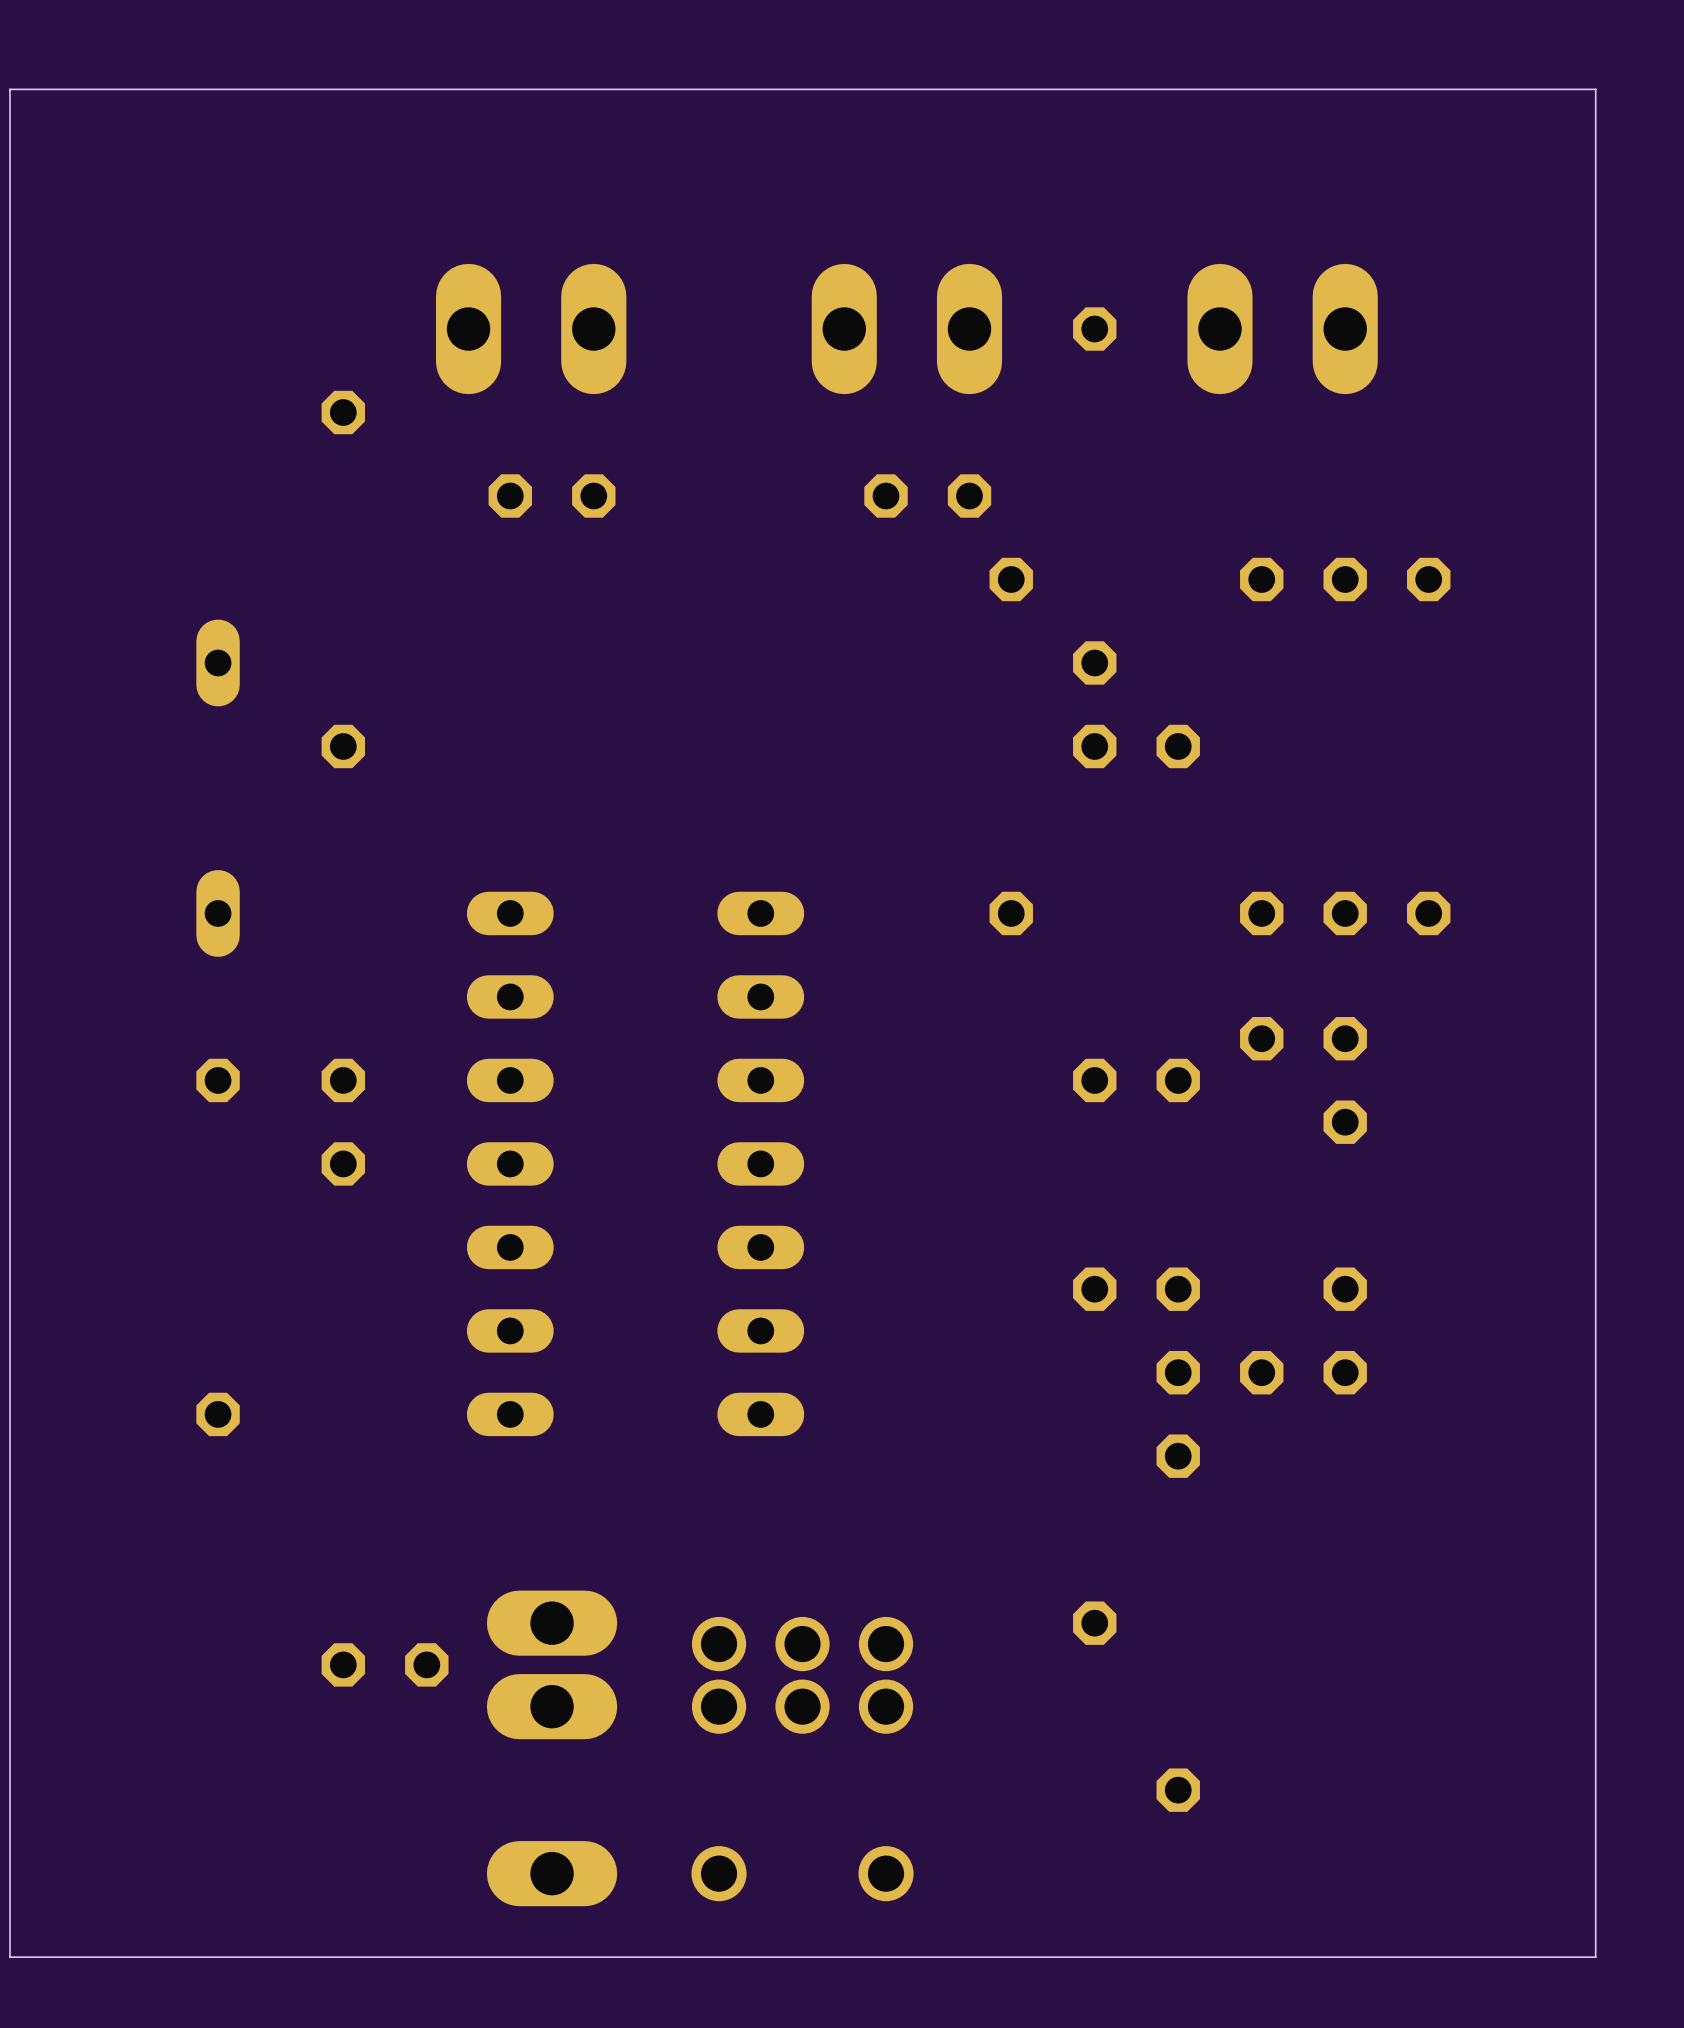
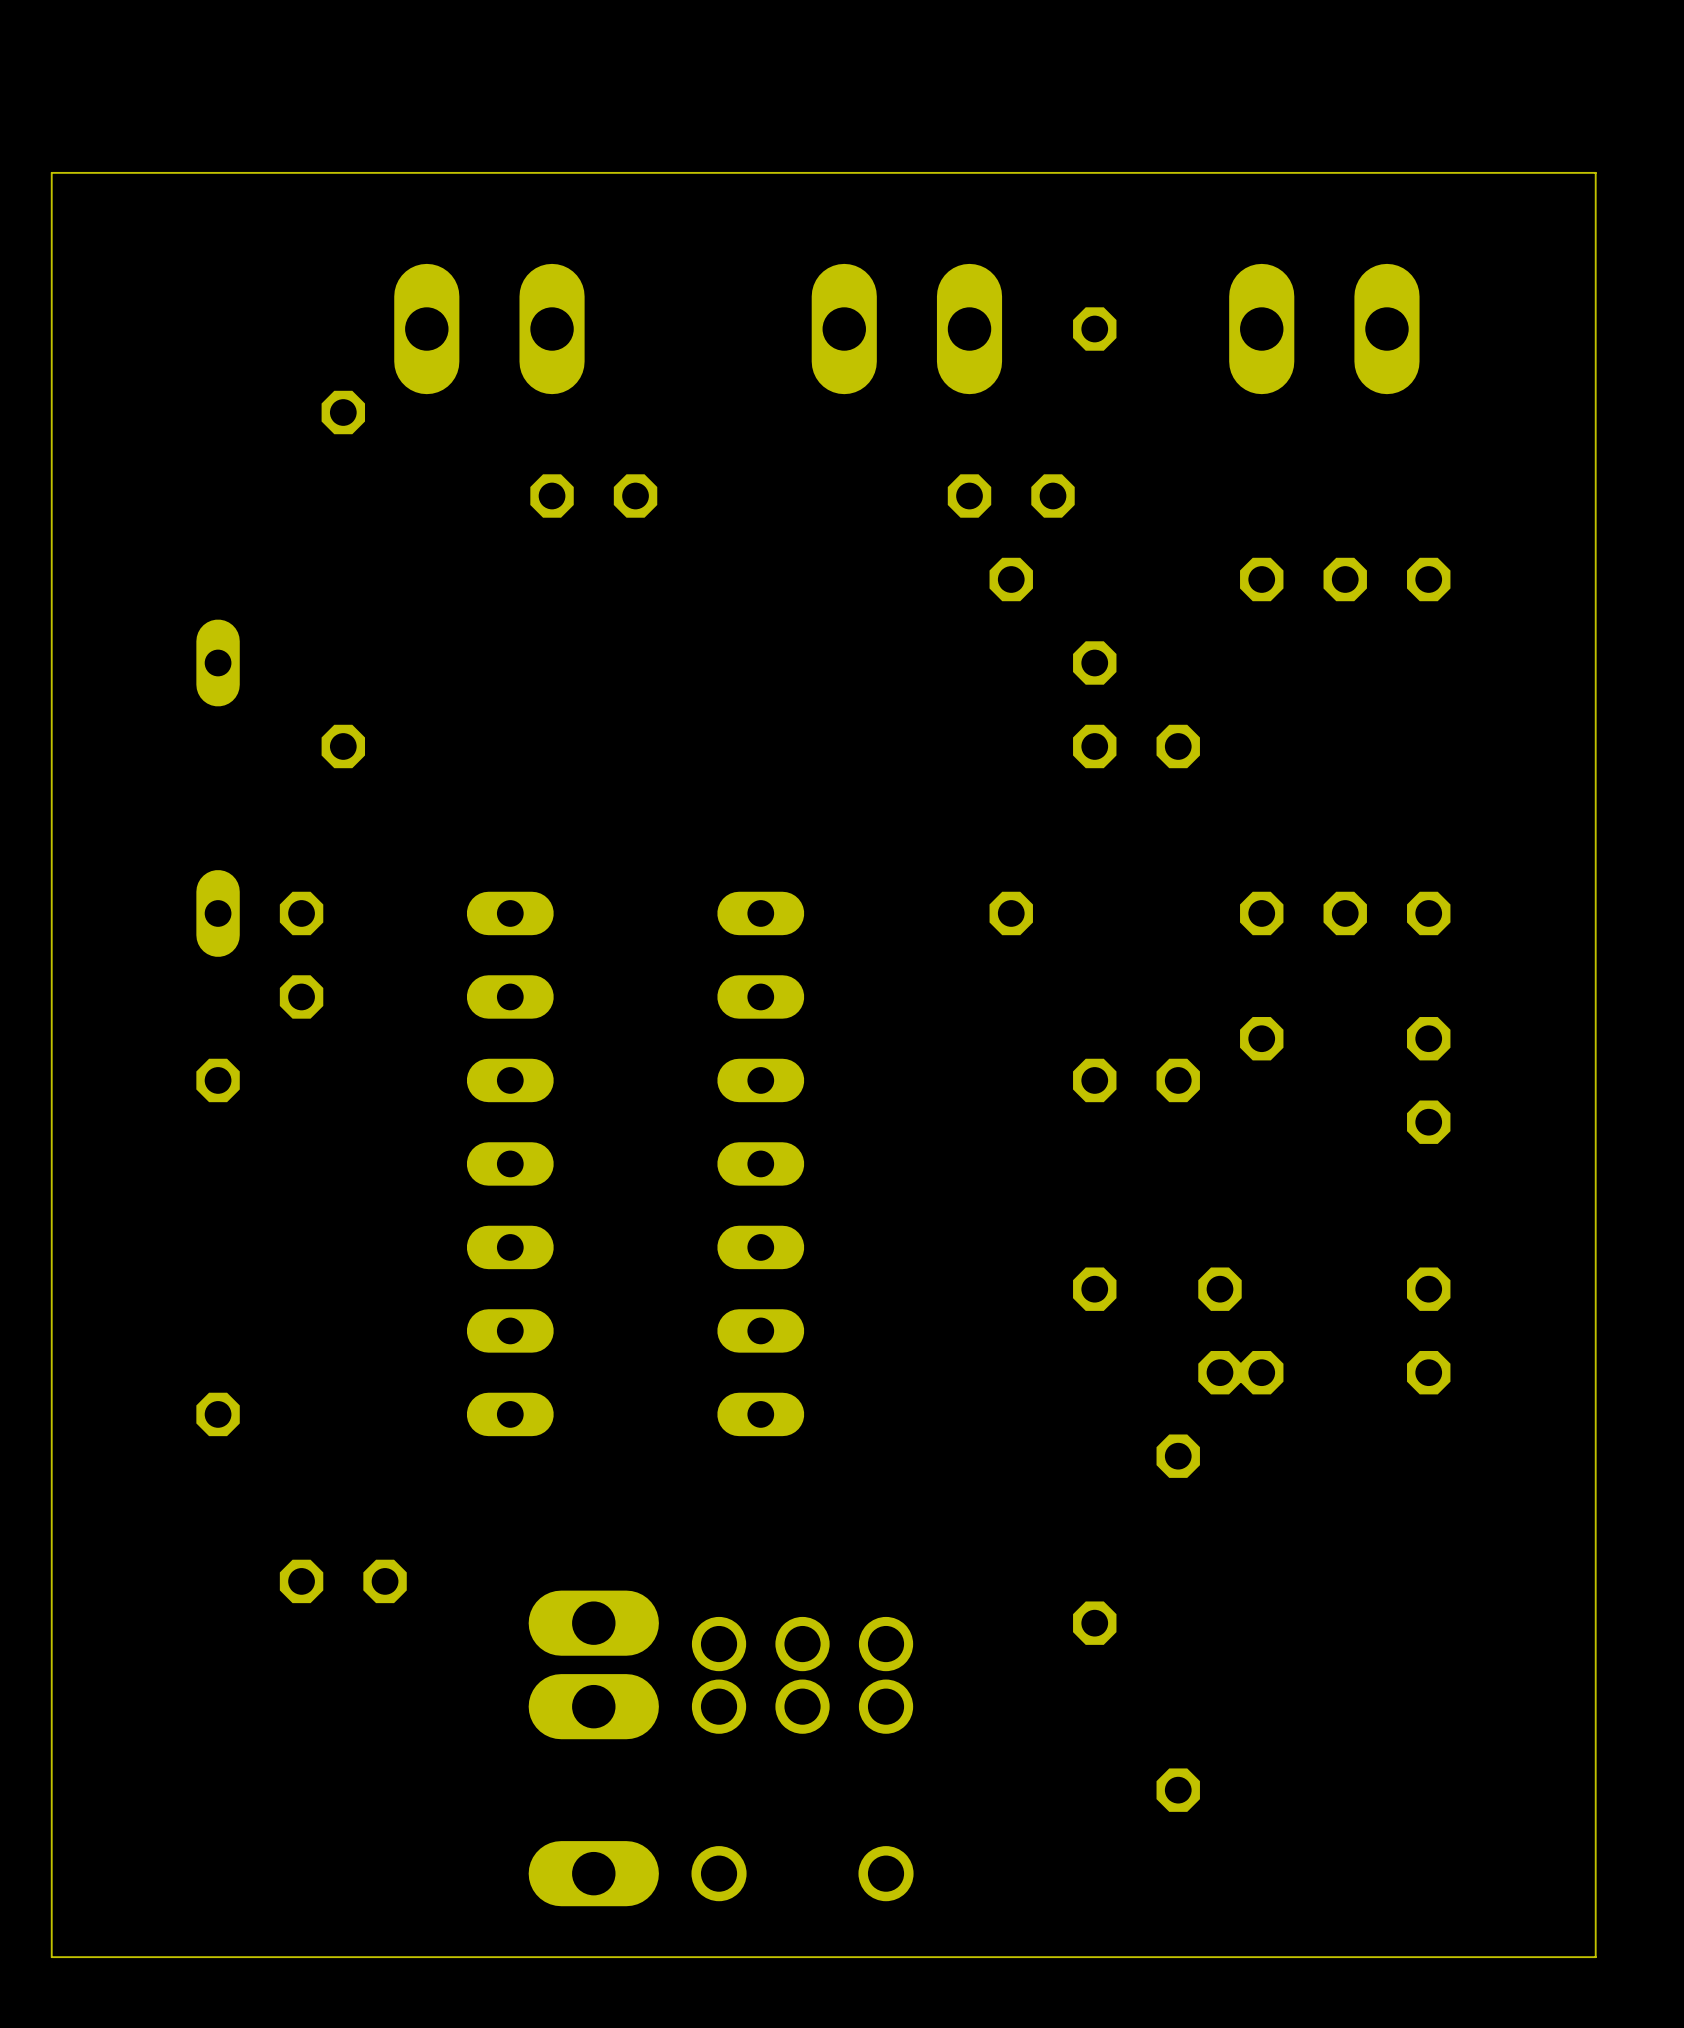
board edge: (1595, 172) (1595, 89) (9, 89) (9, 1957) (51, 1957) -> (1595, 172) (51, 172) (51, 1957)
part: none -> (426, 329)
part: (468, 329) -> none
part: none -> (552, 329)
part: (593, 329) -> none
part: (1219, 329) -> none
part: none -> (1261, 329)
part: (1345, 329) -> none
part: none -> (1386, 329)
part position: (552, 496) -> (593, 496)
part position: (927, 496) -> (1011, 496)
part position: (1345, 1080) -> (1428, 1080)
part position: (343, 1122) -> (301, 955)
part position: (1178, 1330) -> (1219, 1330)
part: (1345, 1330) -> none
part: none -> (1428, 1330)
part position: (552, 1623) -> (593, 1623)
part position: (385, 1664) -> (343, 1581)
part position: (552, 1706) -> (593, 1706)
part position: (552, 1873) -> (593, 1873)

